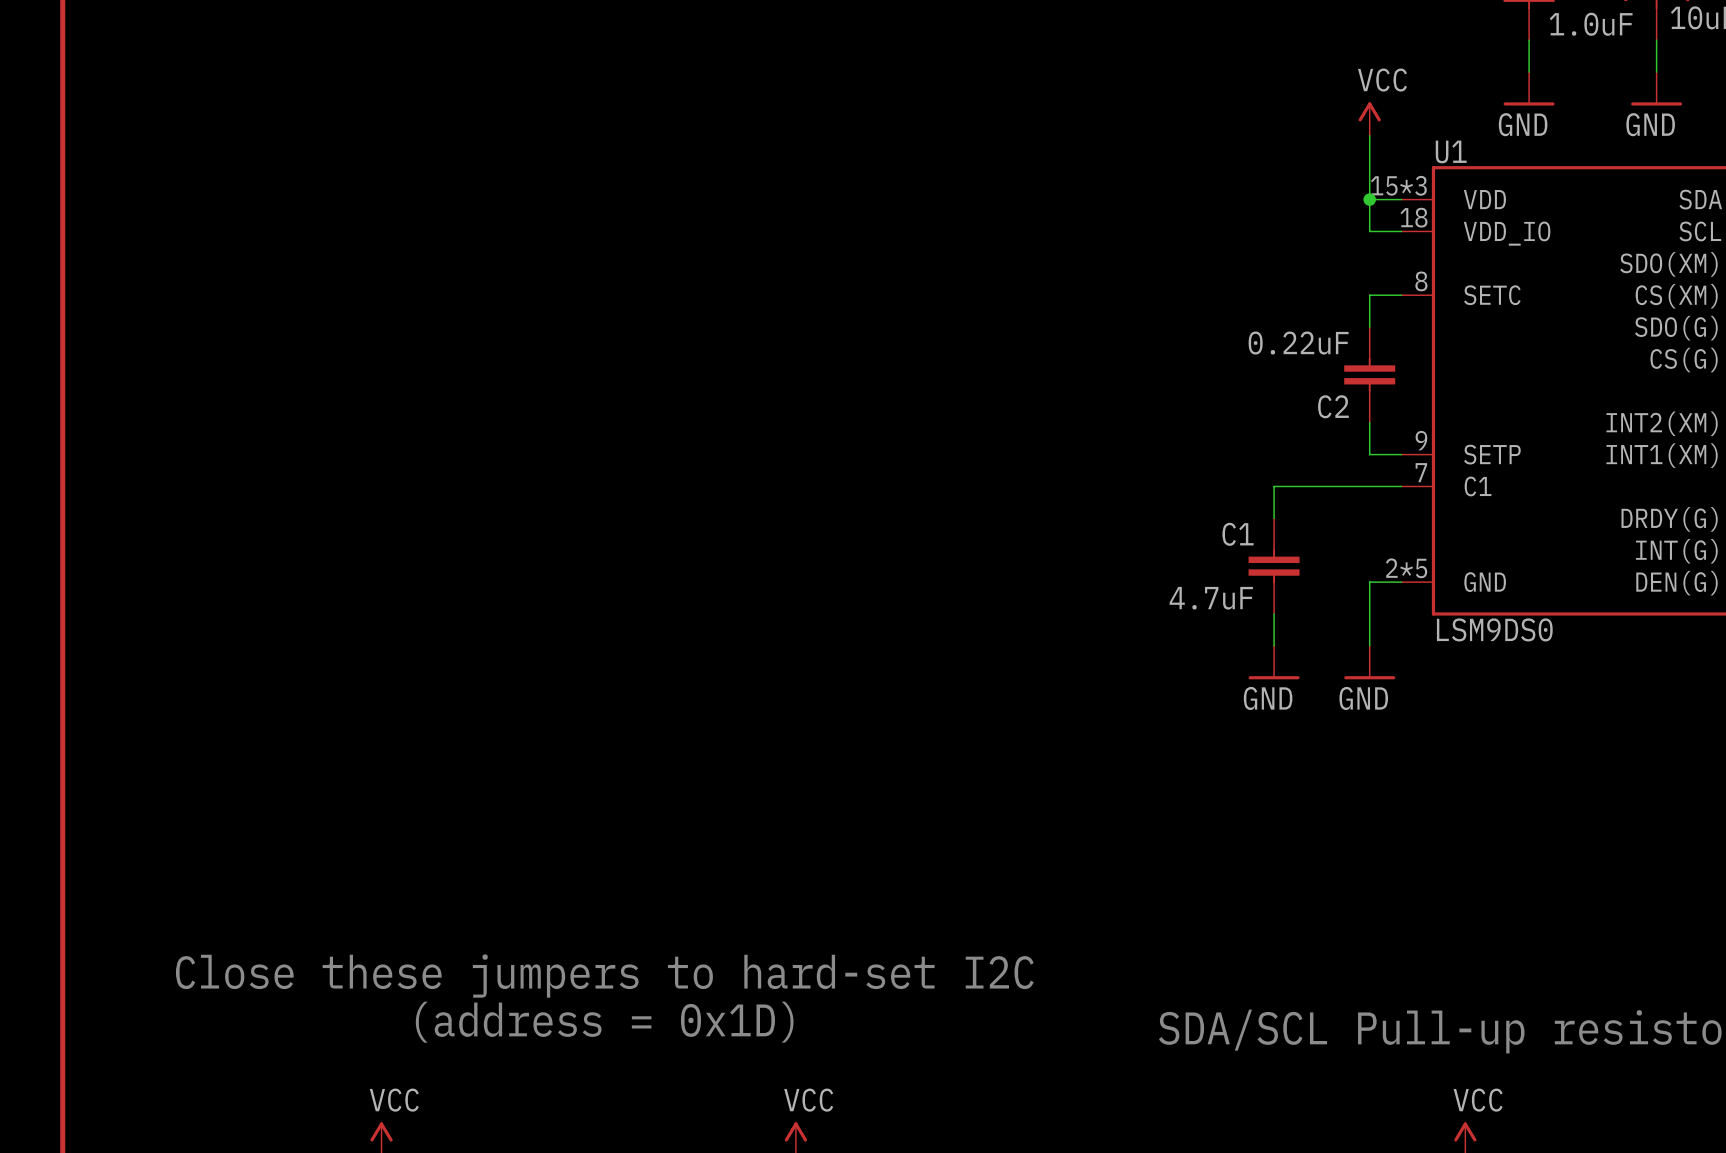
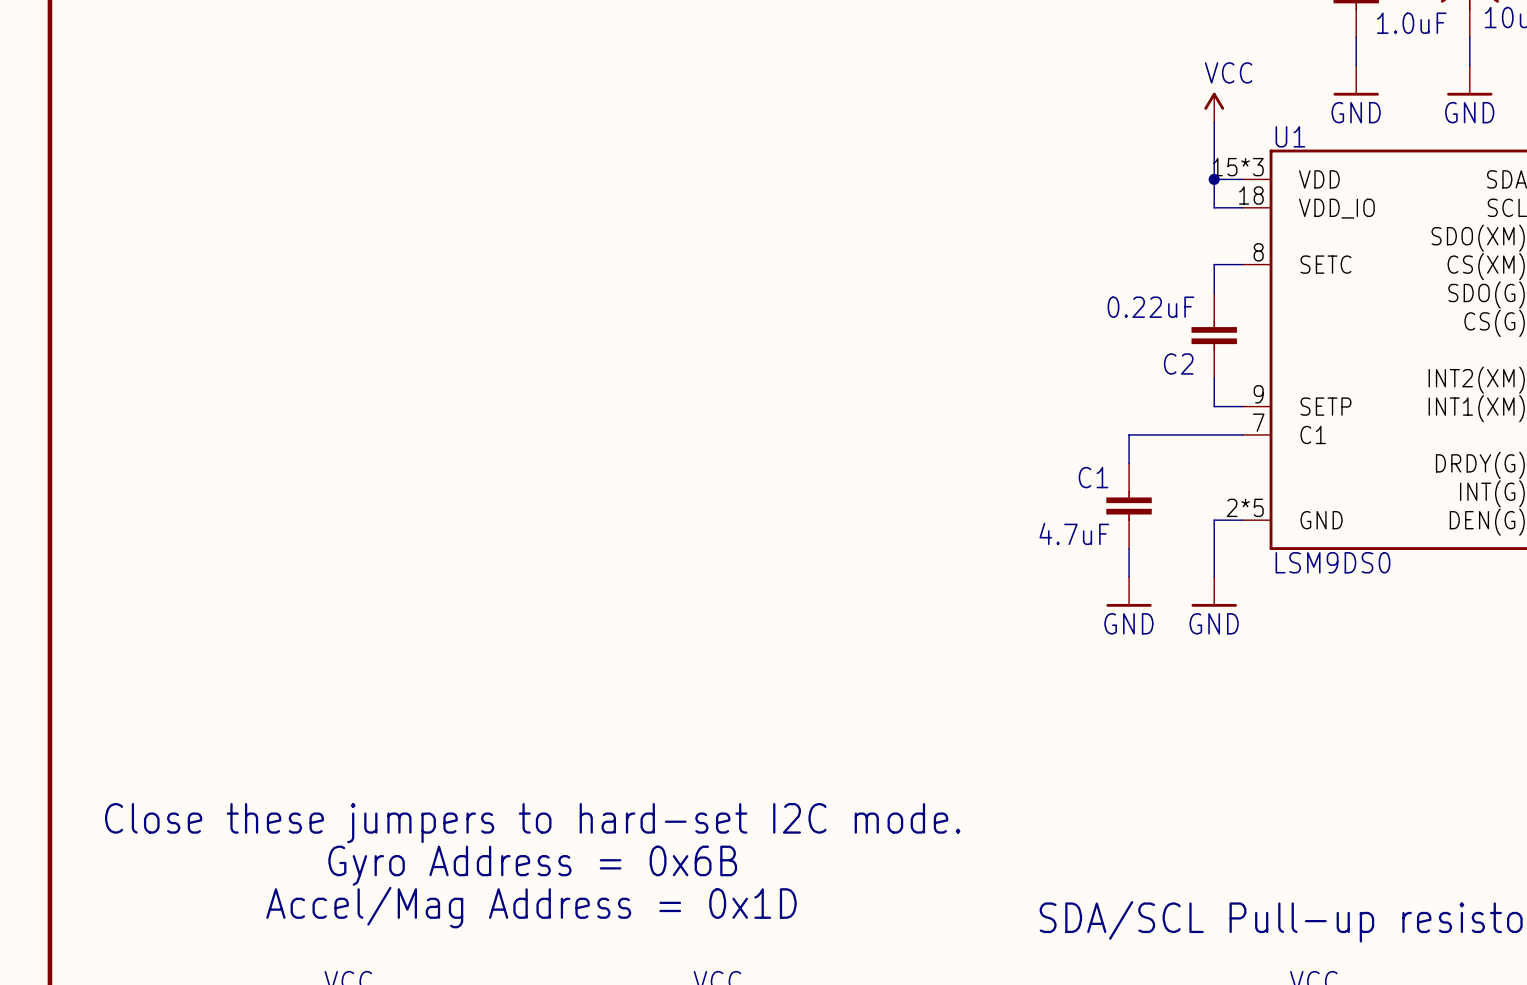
text: none -> Close these jumpers to hard-set I2C mode. (532, 823)
text: Close these jumpers to hard-set I2C (604, 976) -> Gyro Address = 0x6B (532, 865)
text: (address = 0x1D) (604, 1022) -> Accel/Mag Address = 0x1D (531, 907)

